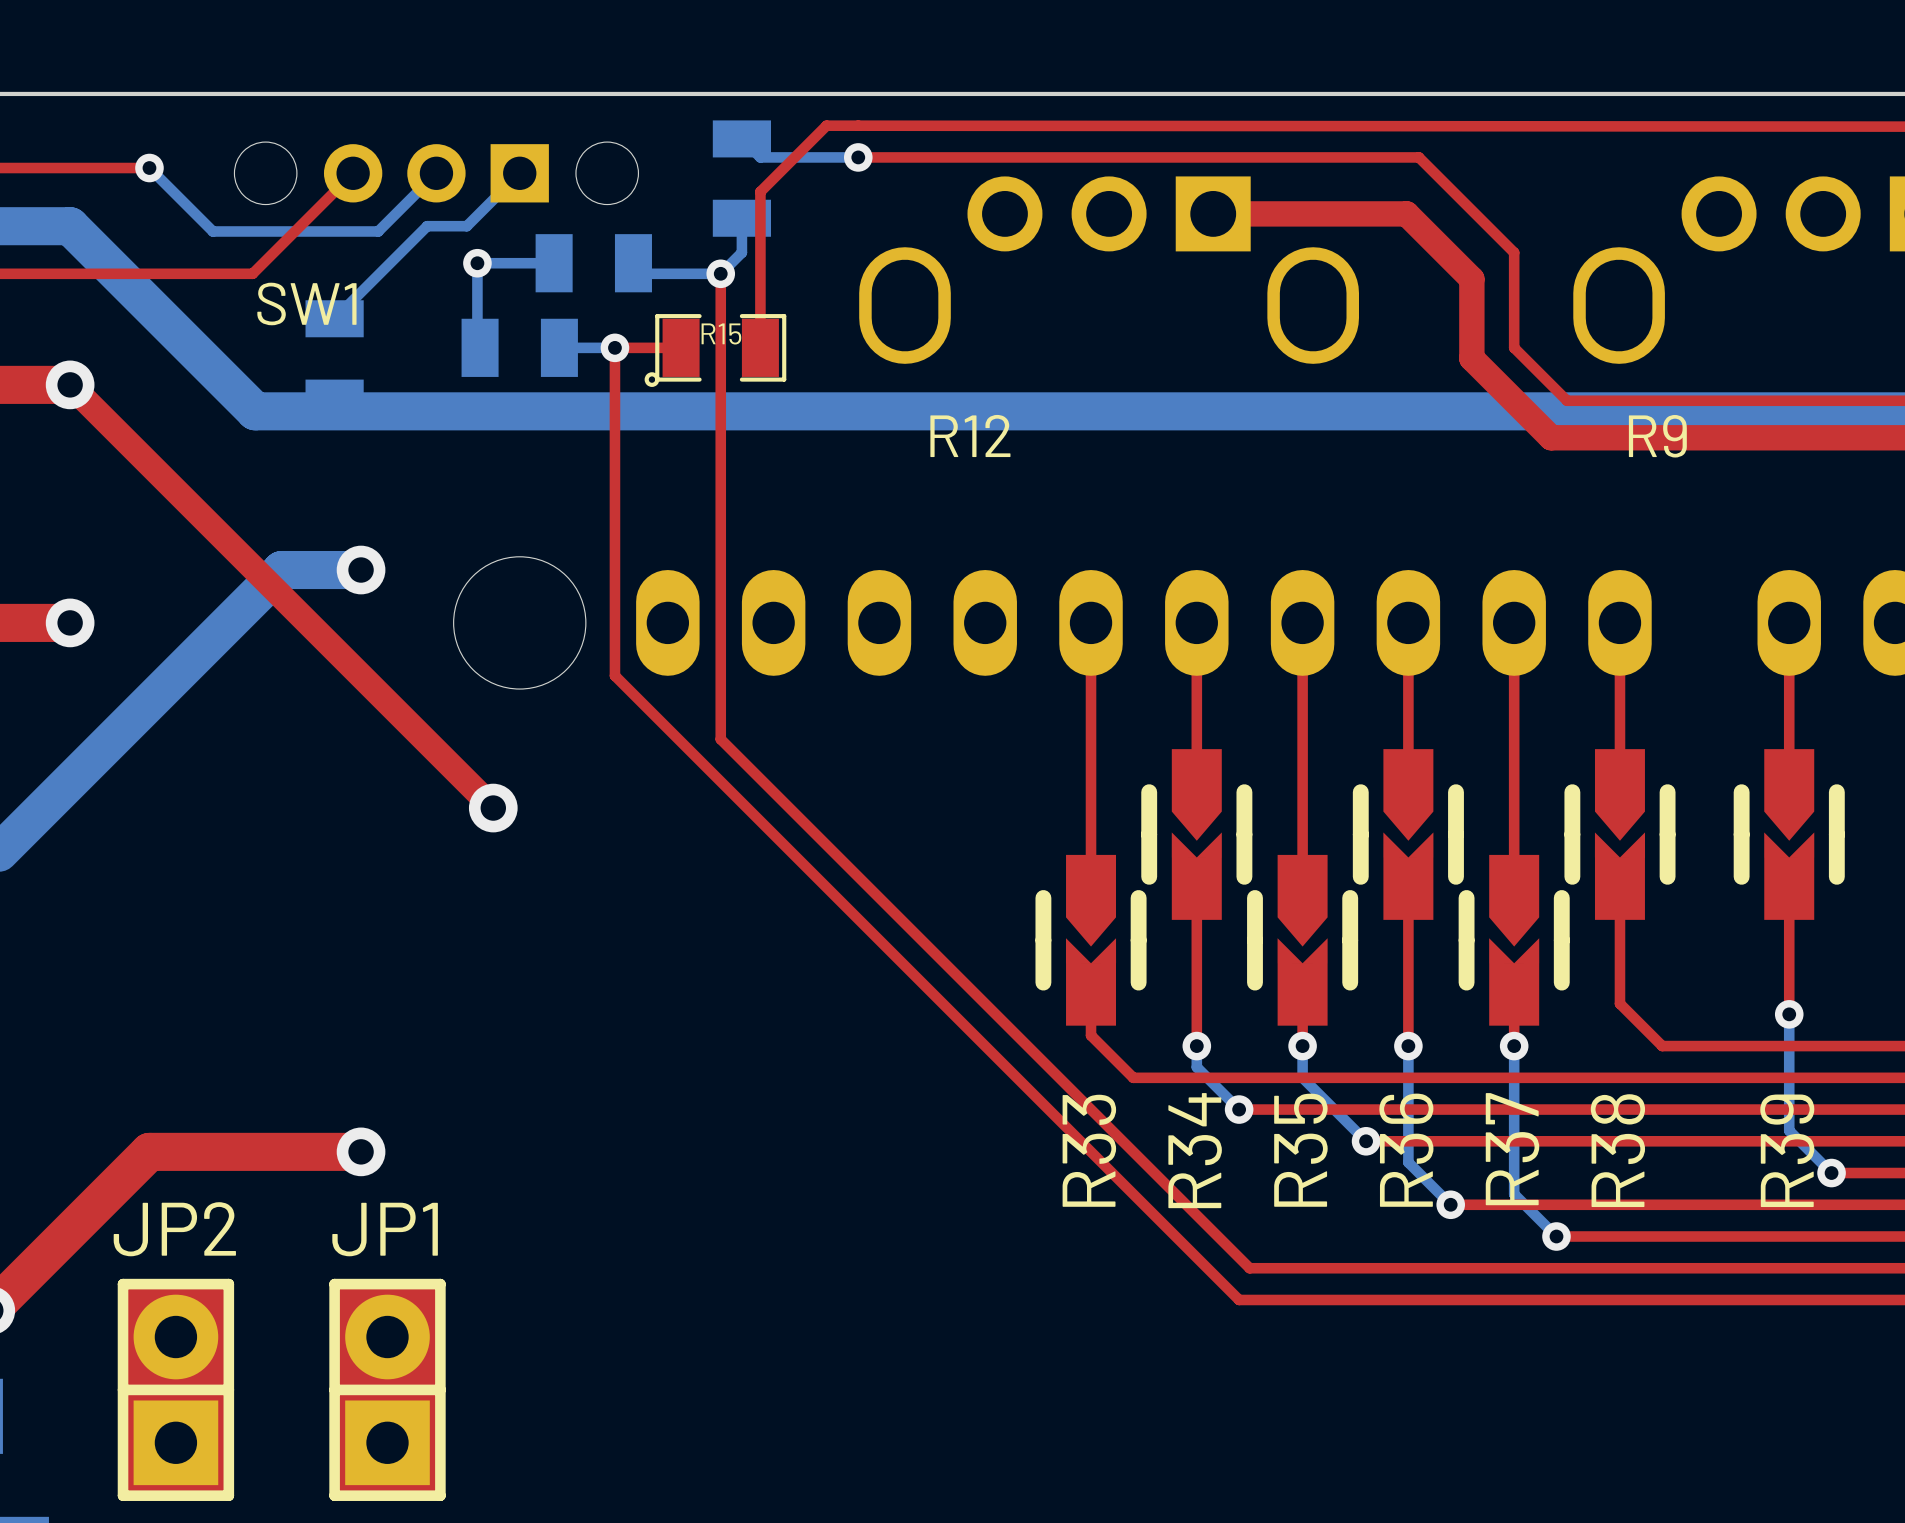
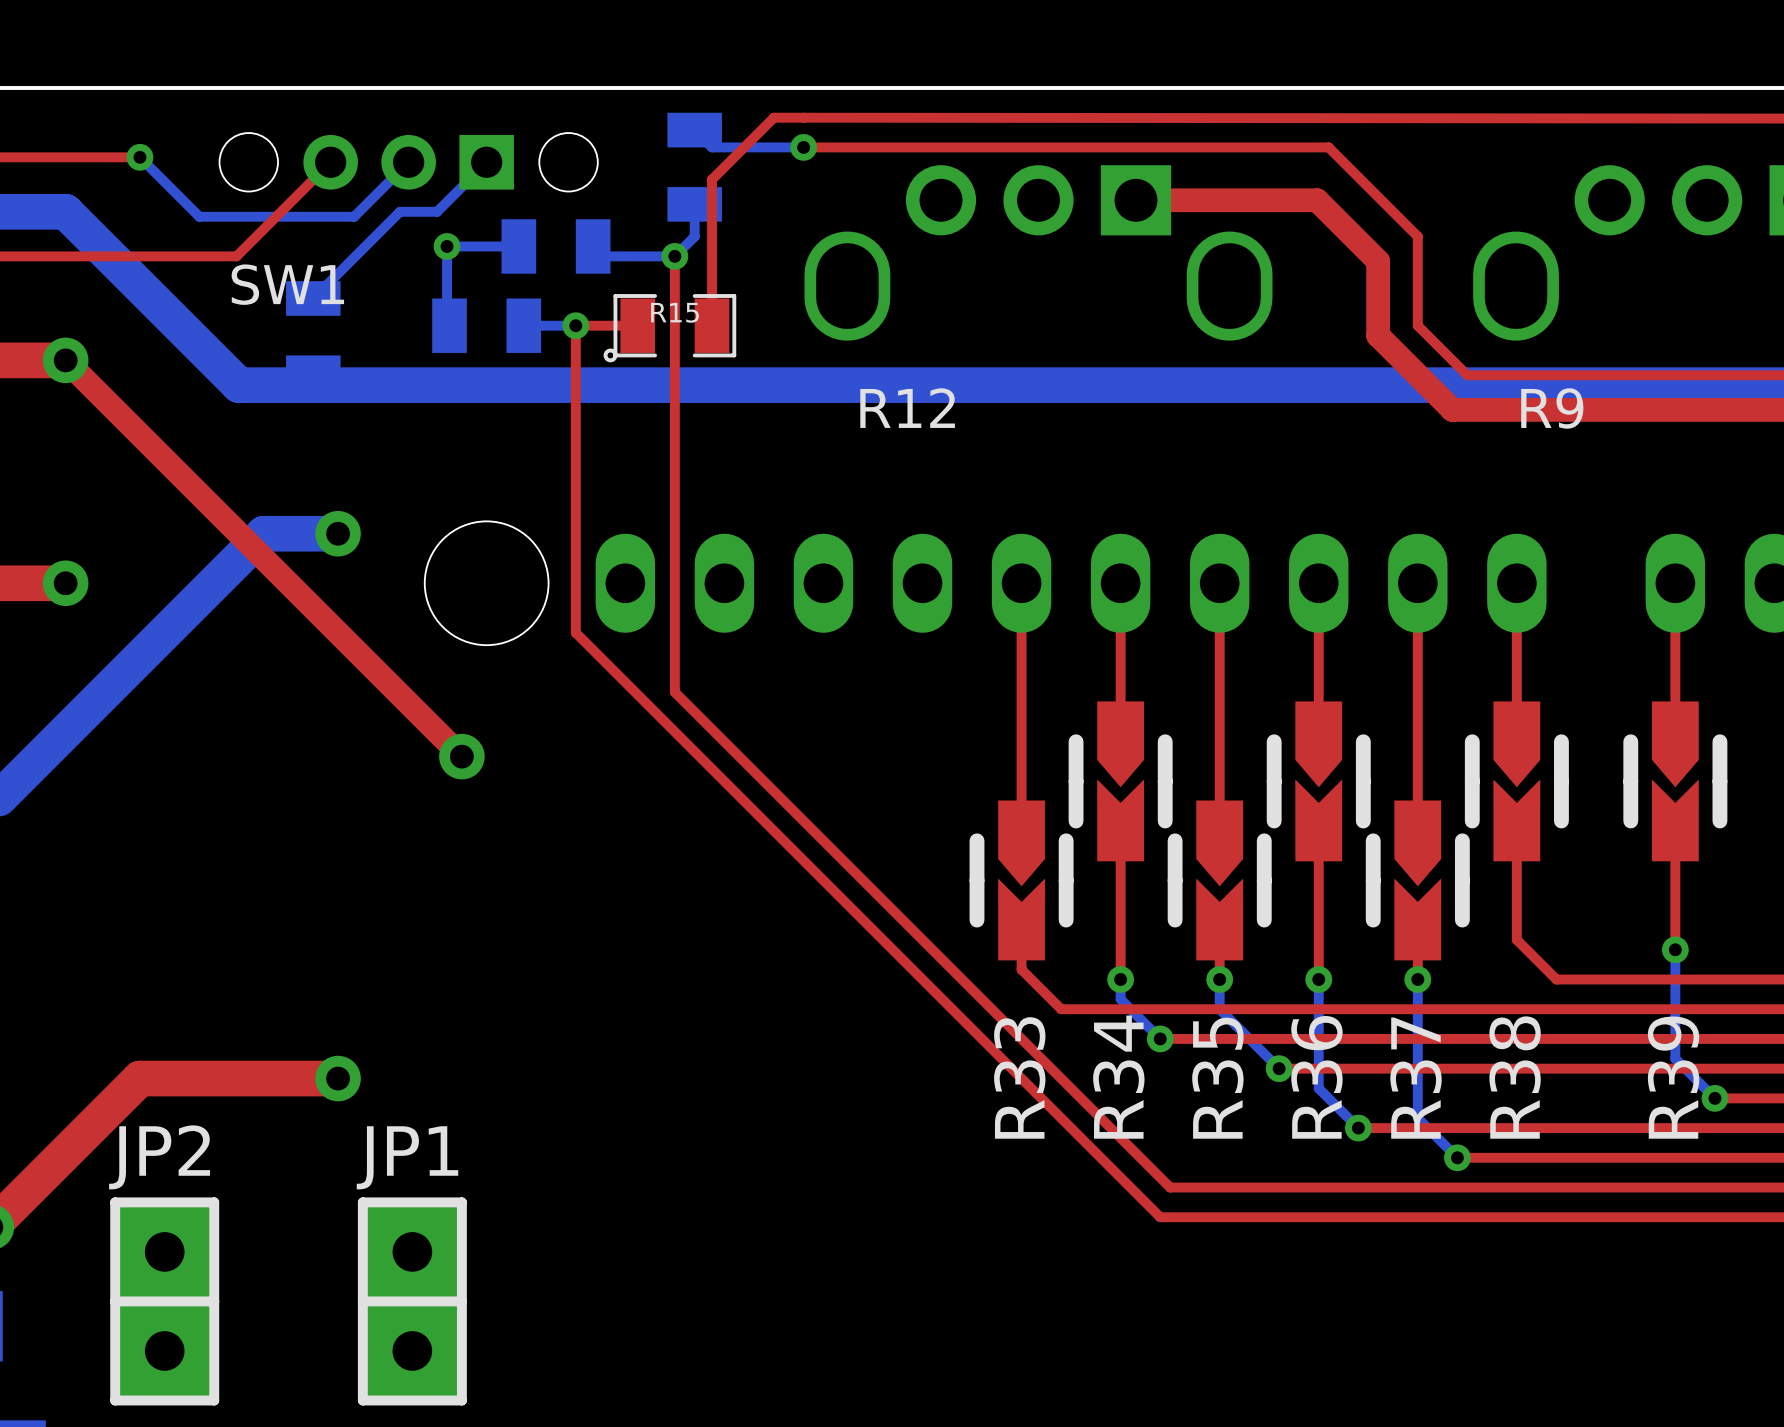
JP2 footprint: [117, 1278, 235, 1501] -> [110, 1197, 220, 1406]
JP1 footprint: [329, 1278, 446, 1501] -> [357, 1197, 467, 1406]

